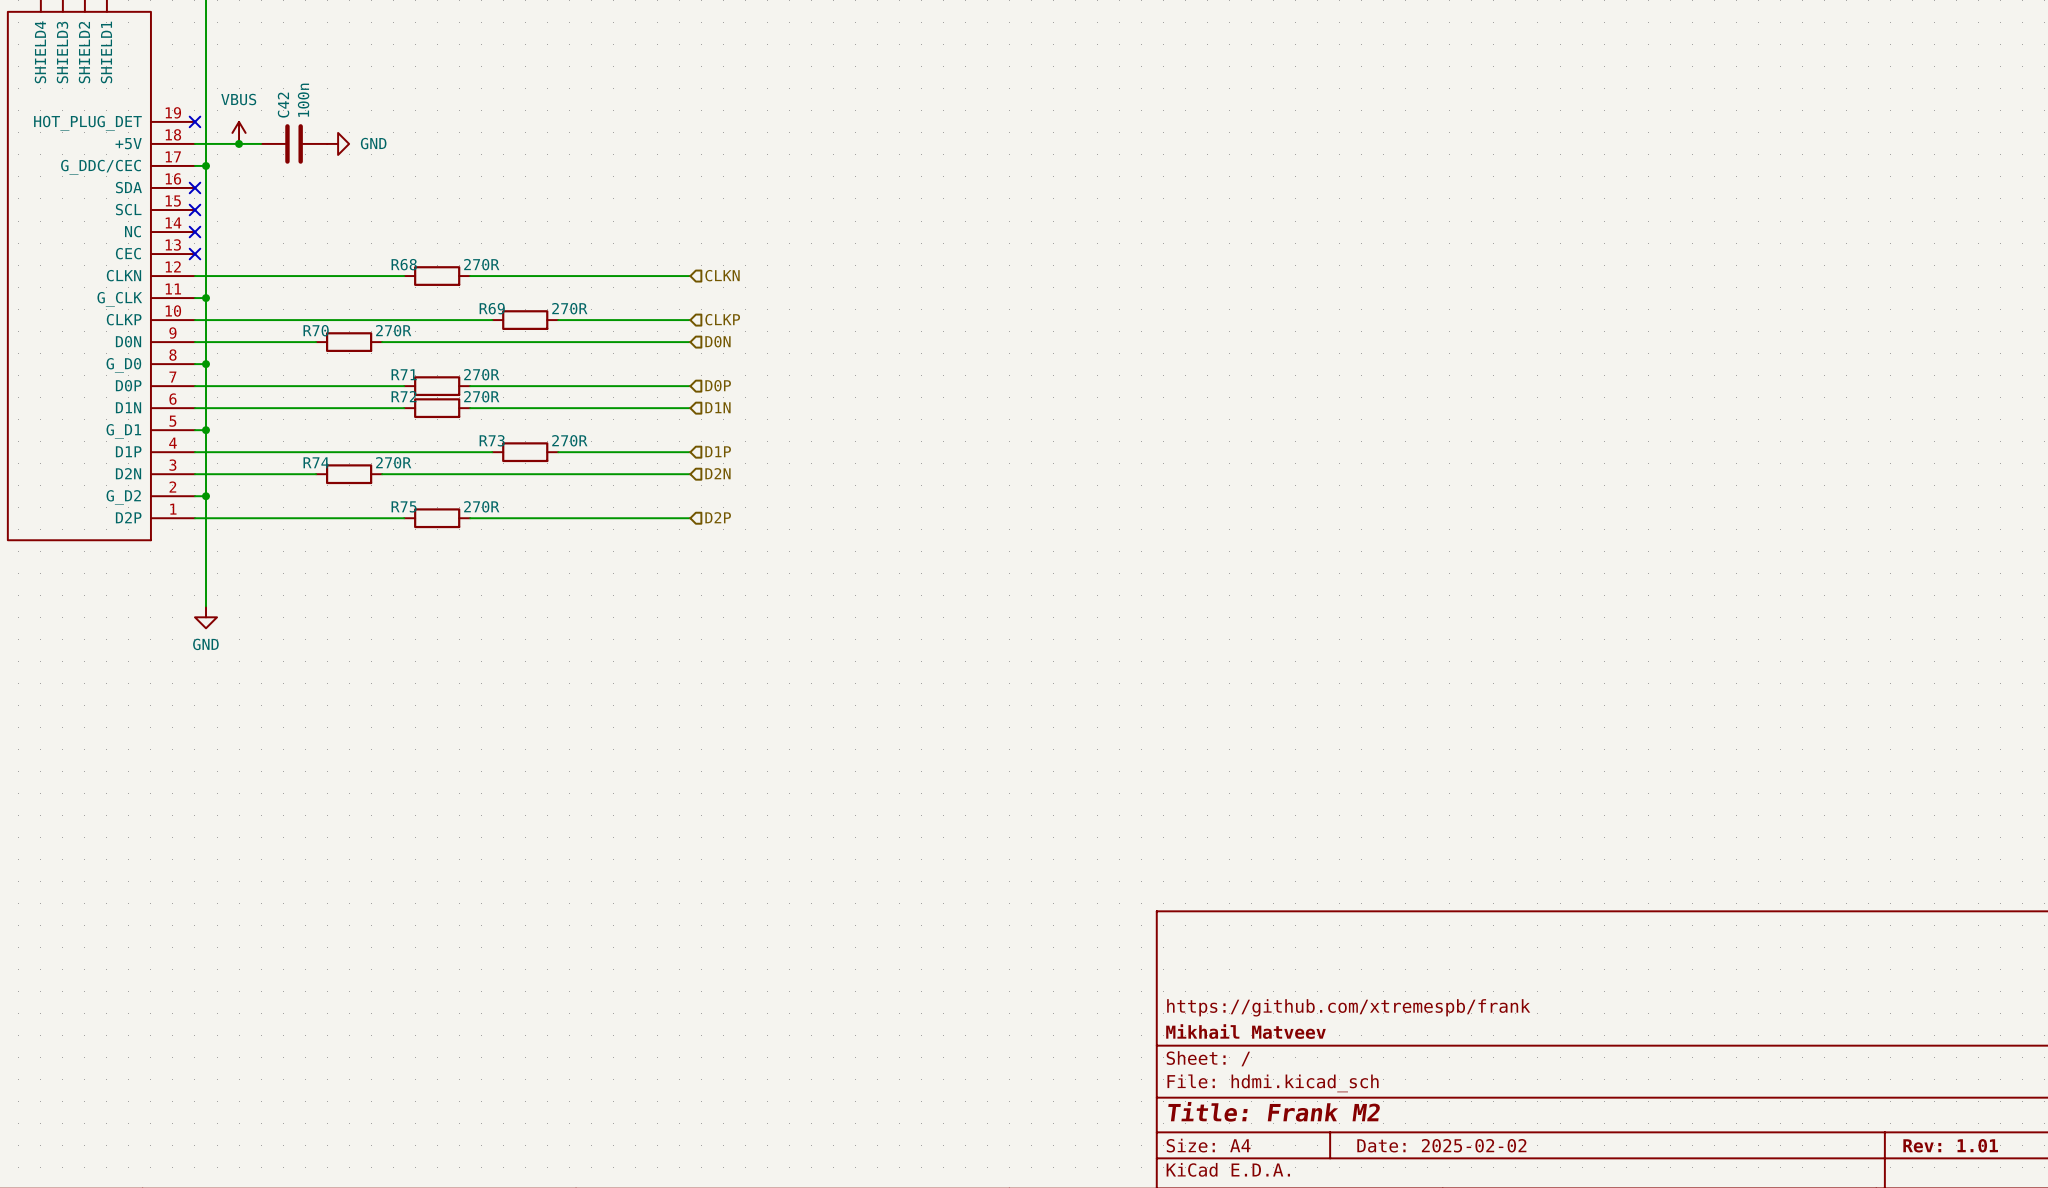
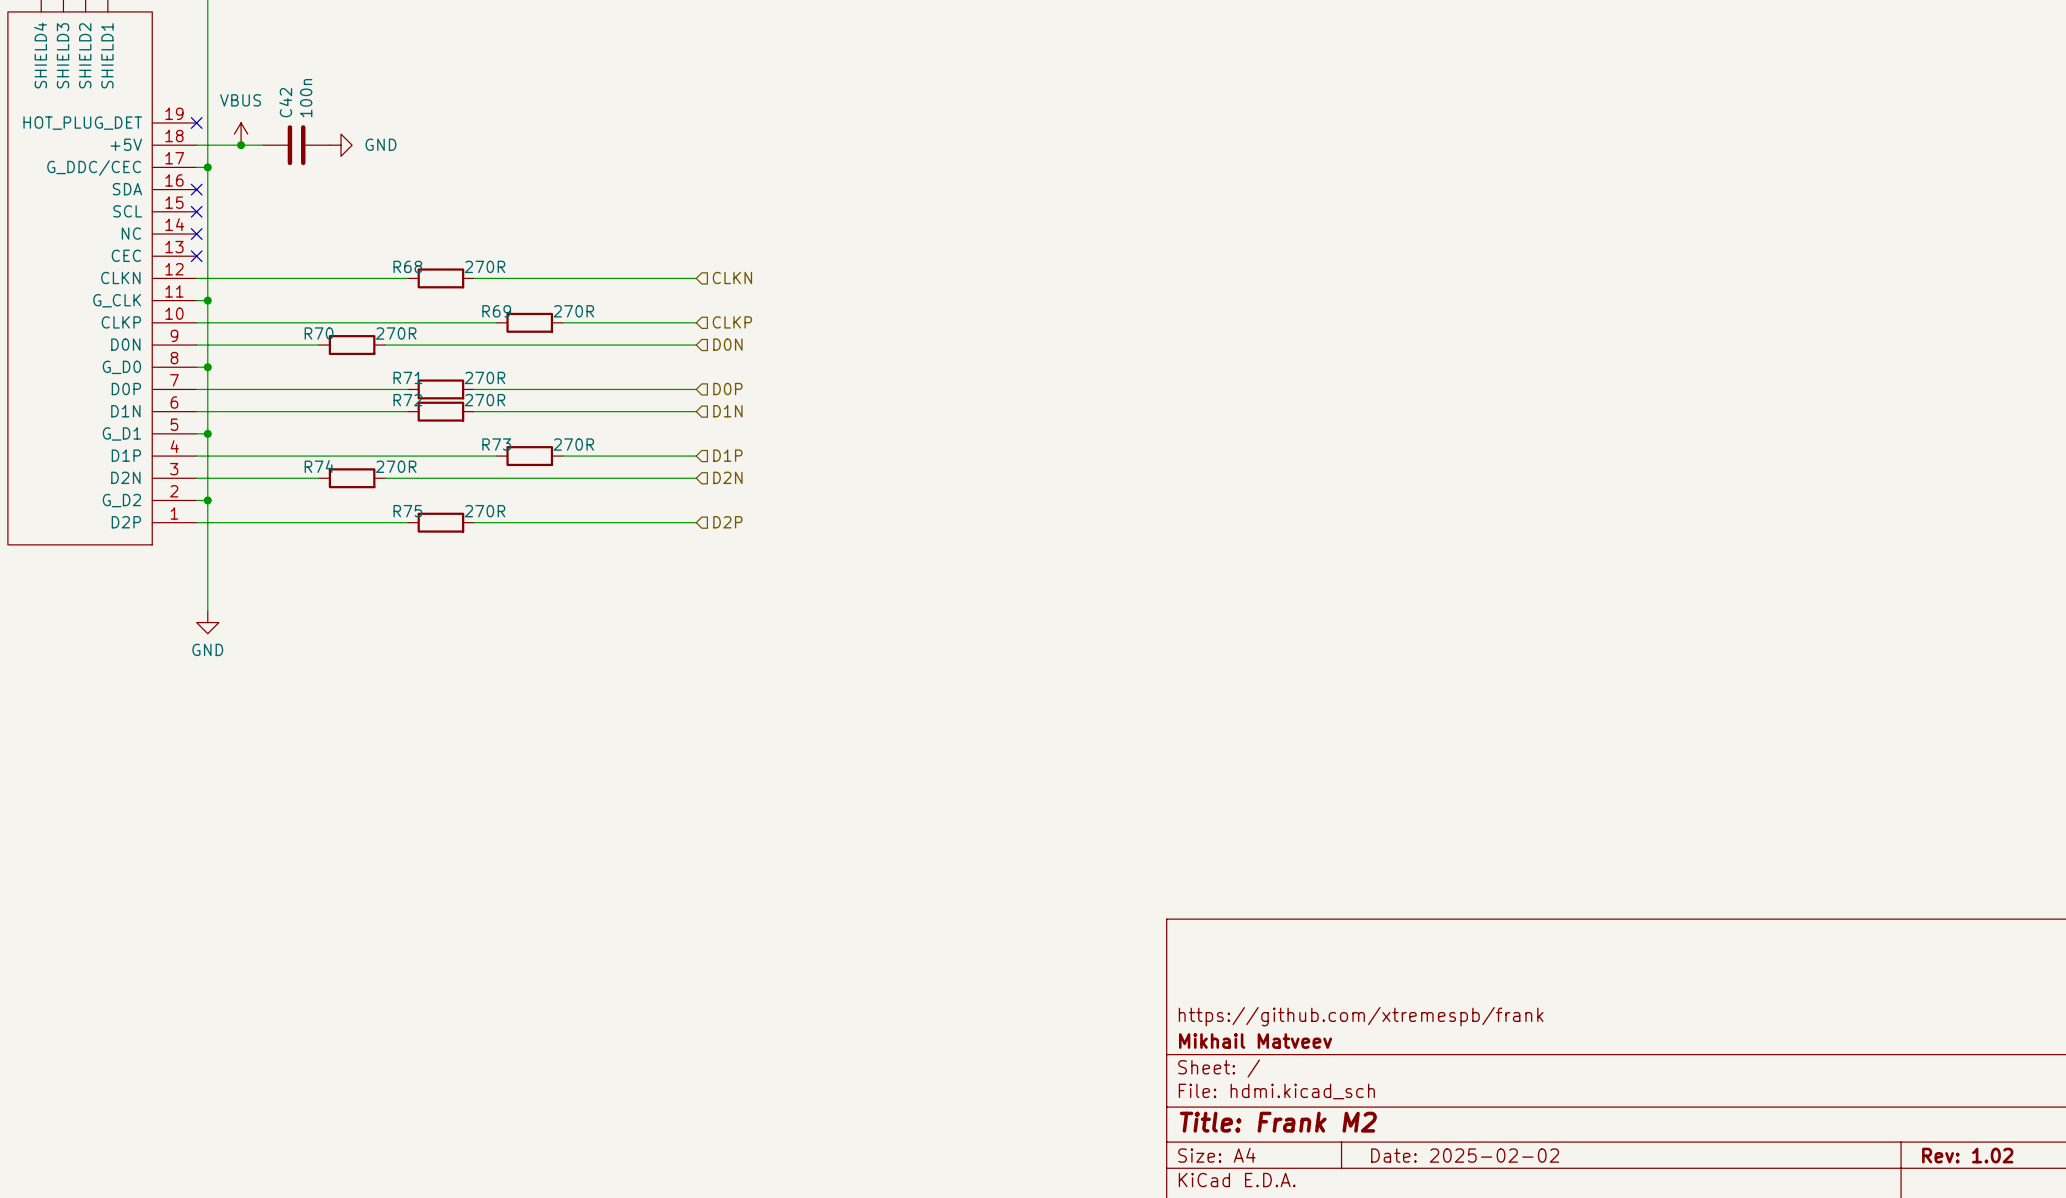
title block: Rev: 1.01 (1950, 1145) -> Rev: 1.02 (1967, 1155)

